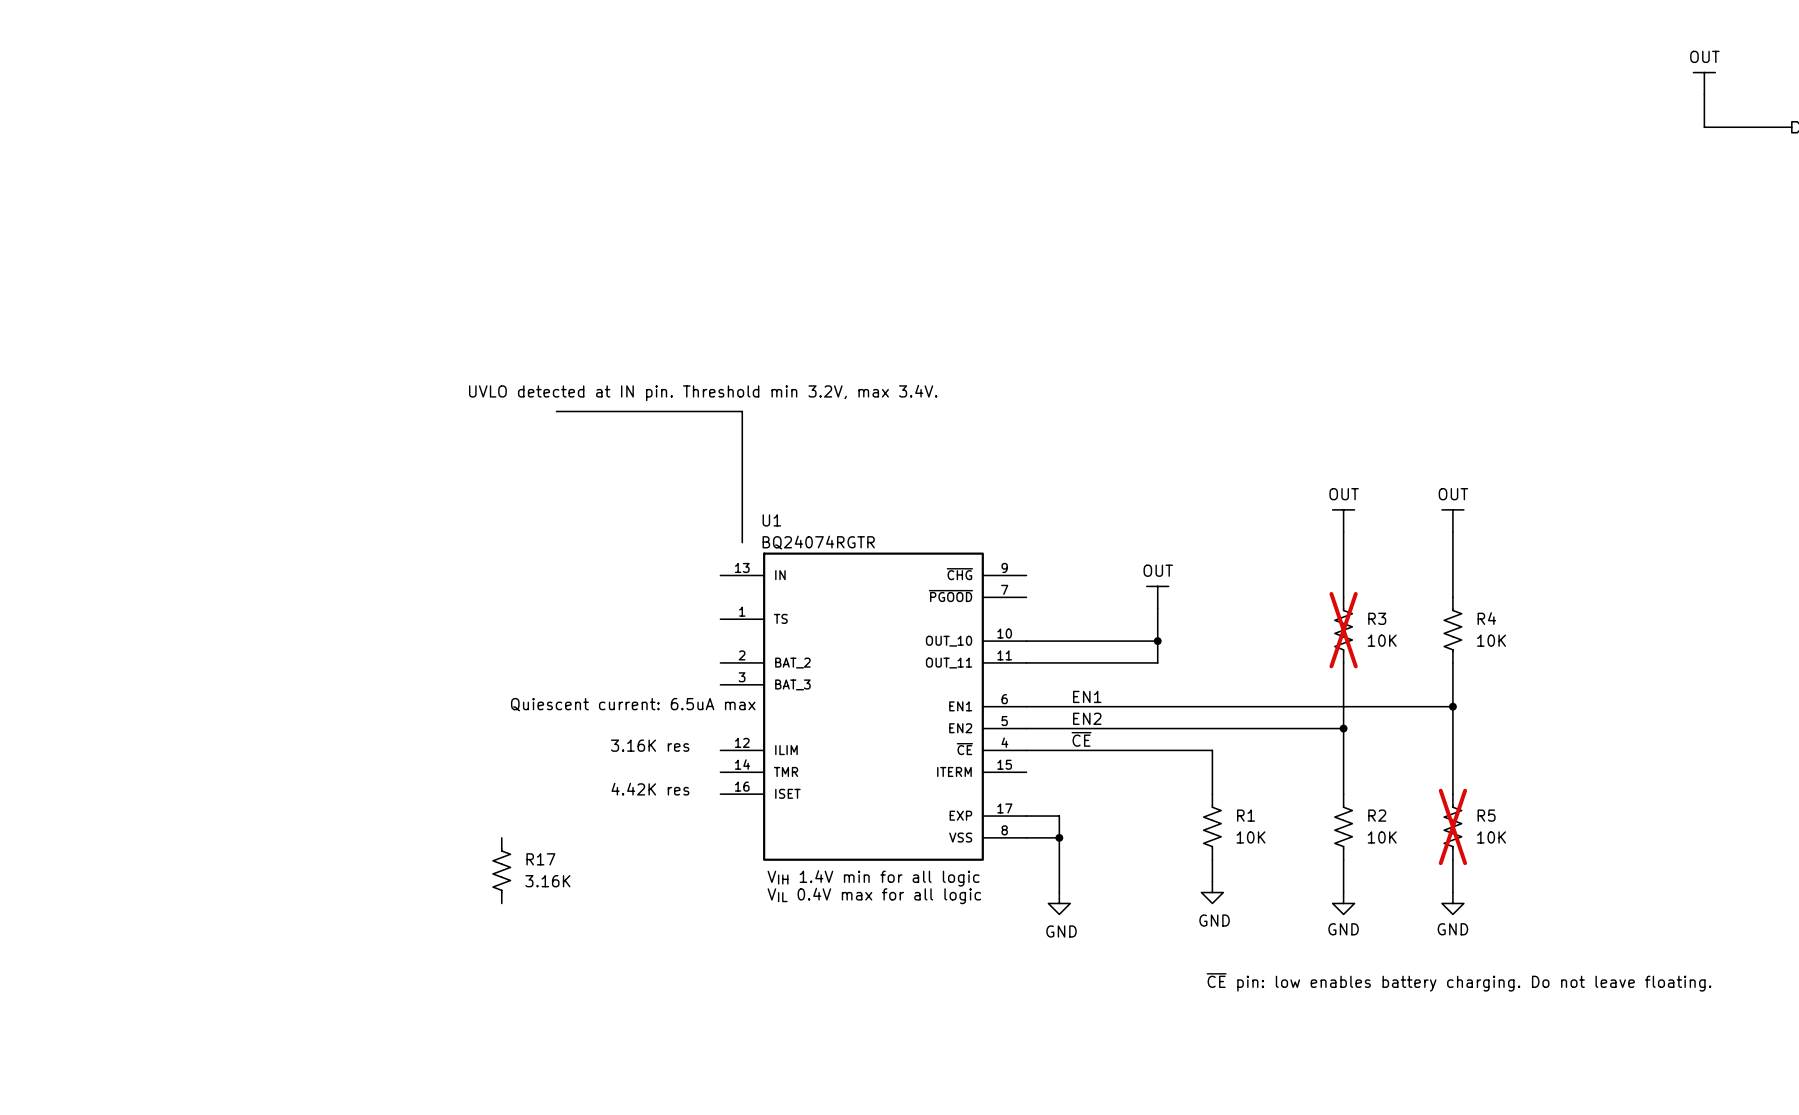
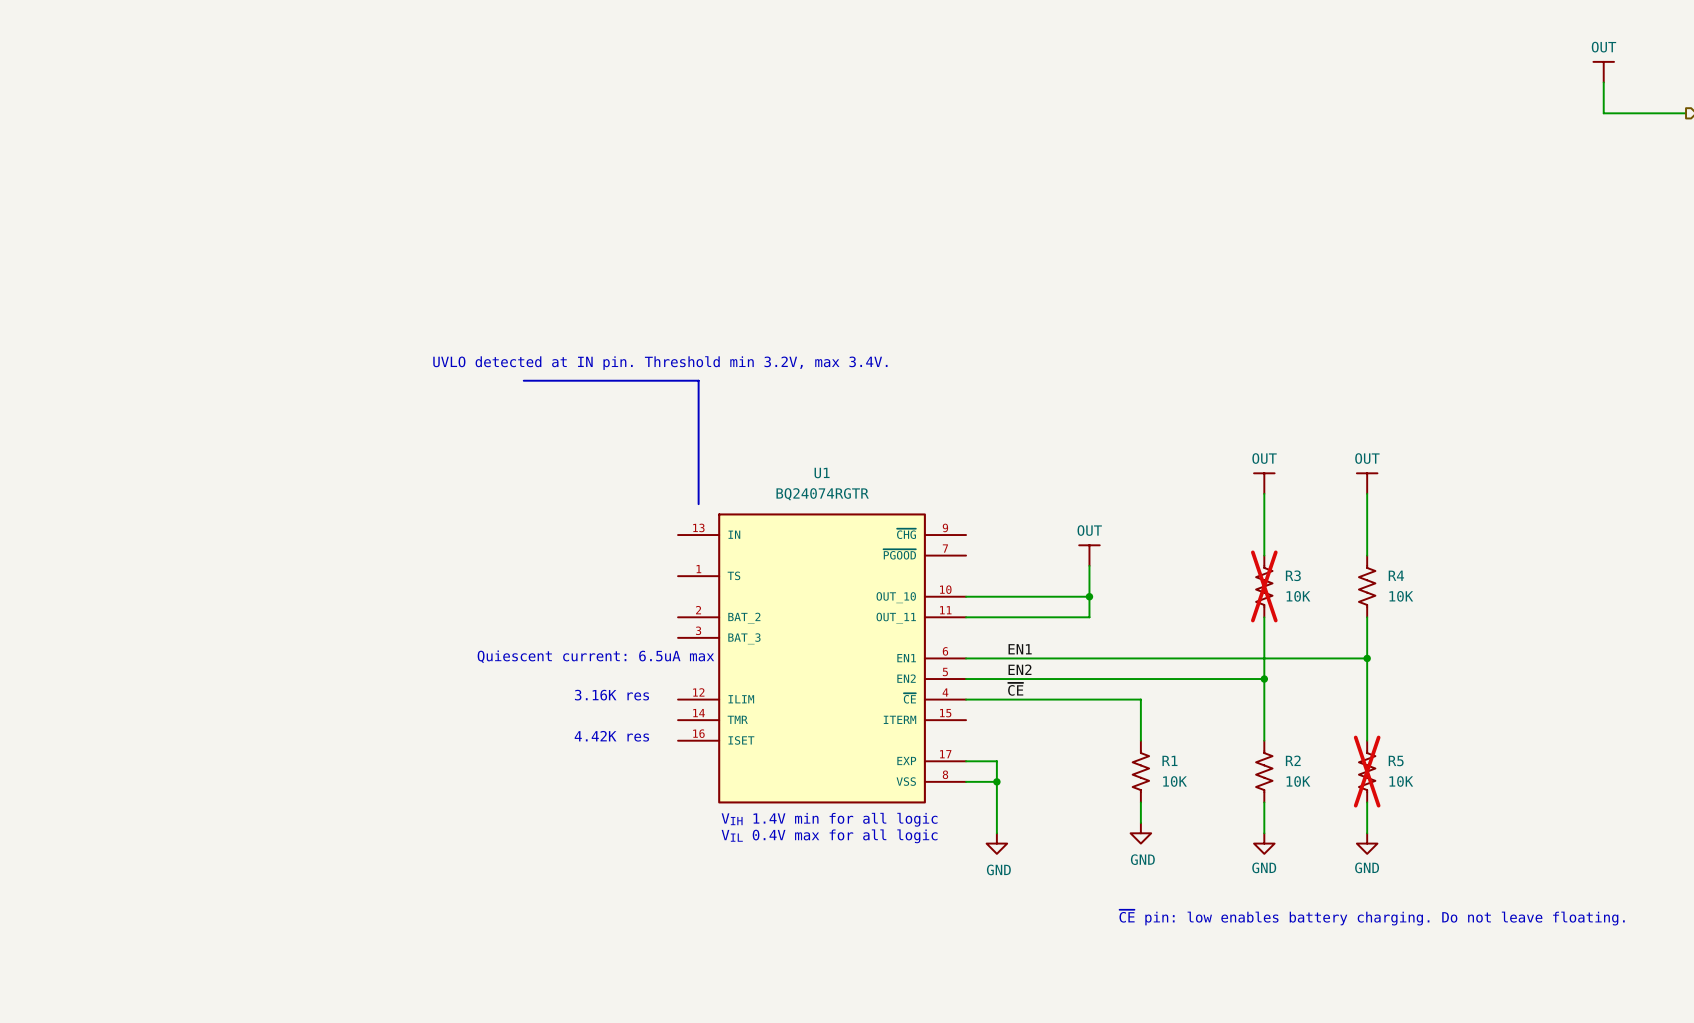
U1 name position: U1 (771, 520) -> U1 (822, 473)
U1 value position: BQ24074RGTR (818, 542) -> BQ24074RGTR (822, 494)
R17: 3.16K (501, 870) -> none

